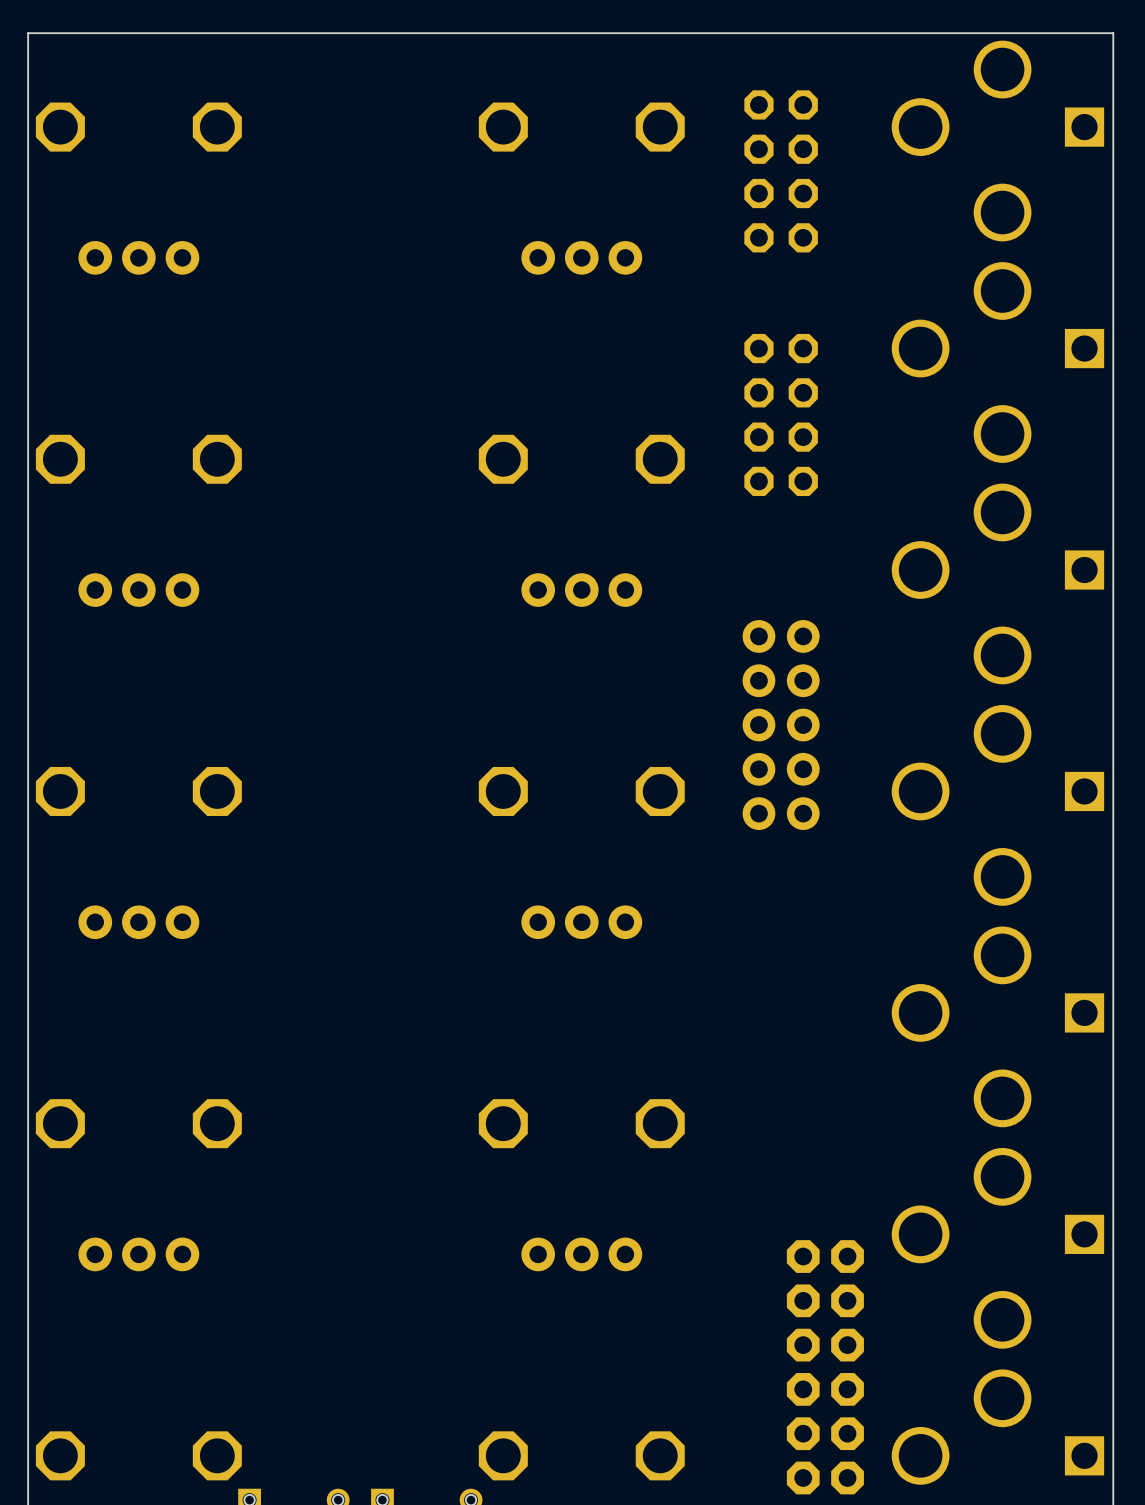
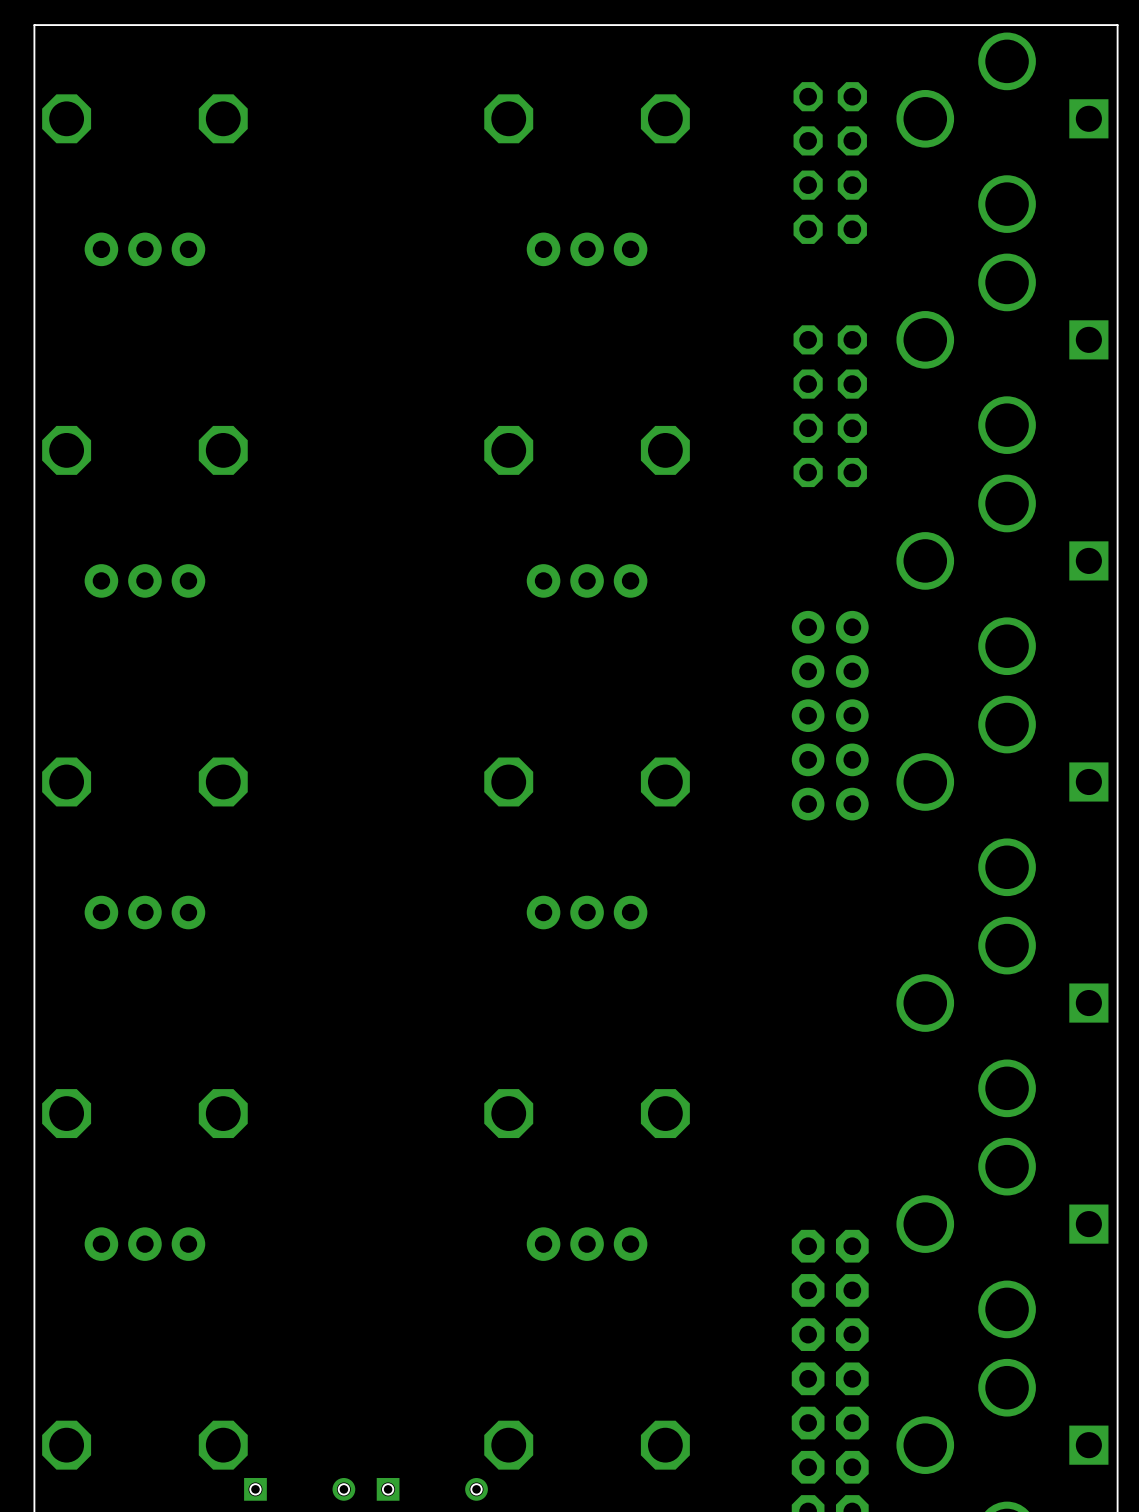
part position: (781, 171) -> (830, 163)
part position: (781, 414) -> (830, 406)
part: (758, 658) -> none
part: none -> (852, 649)
part: (781, 725) -> none
part: none -> (830, 715)
part: (781, 769) -> none
part: none -> (830, 759)
part: (781, 813) -> none
part: none -> (830, 804)

